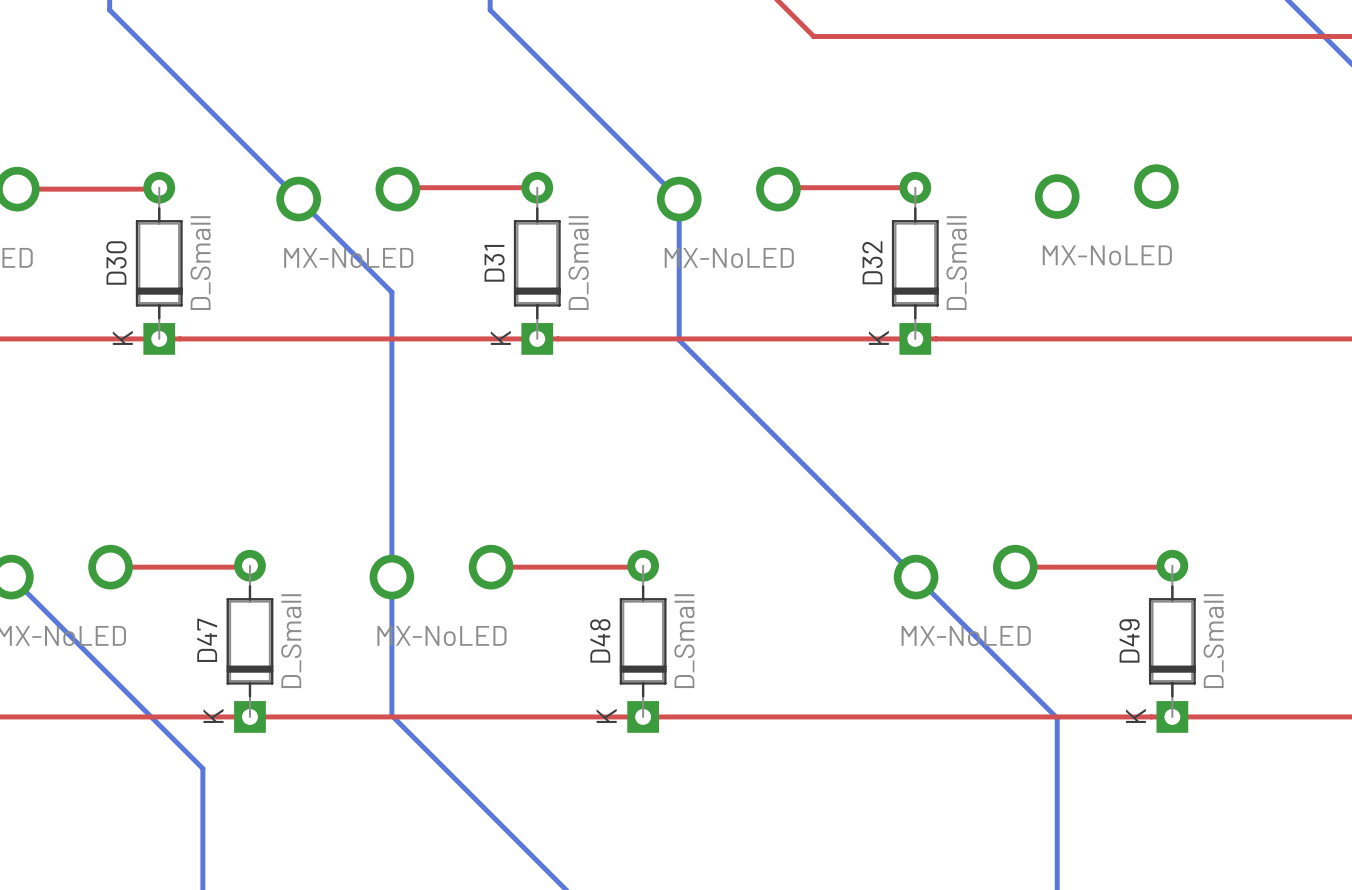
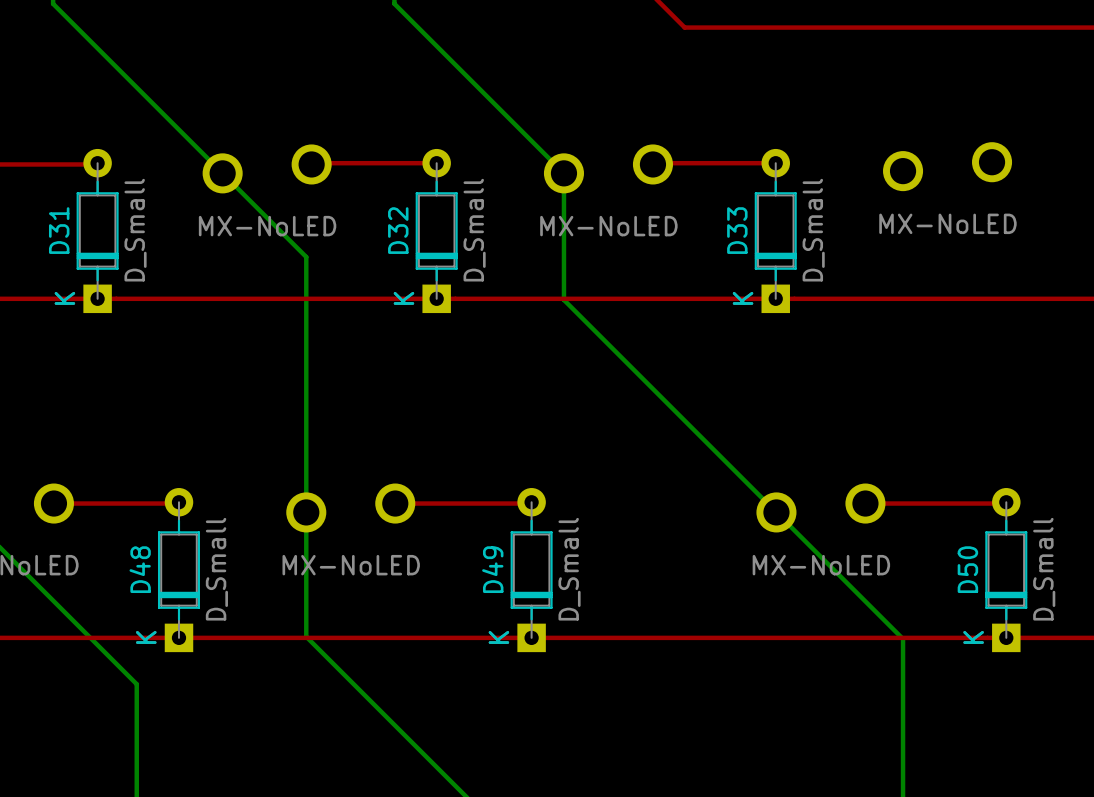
D30 name: D30 (116, 262) -> D31 (59, 230)
D32 name: D32 (872, 262) -> D33 (737, 230)
D31 name: D31 (494, 263) -> D32 (398, 230)
D47 name: D47 (207, 640) -> D48 (140, 569)
D48 name: D48 (600, 640) -> D49 (492, 569)
D49 name: D49 (1129, 640) -> D50 (967, 569)

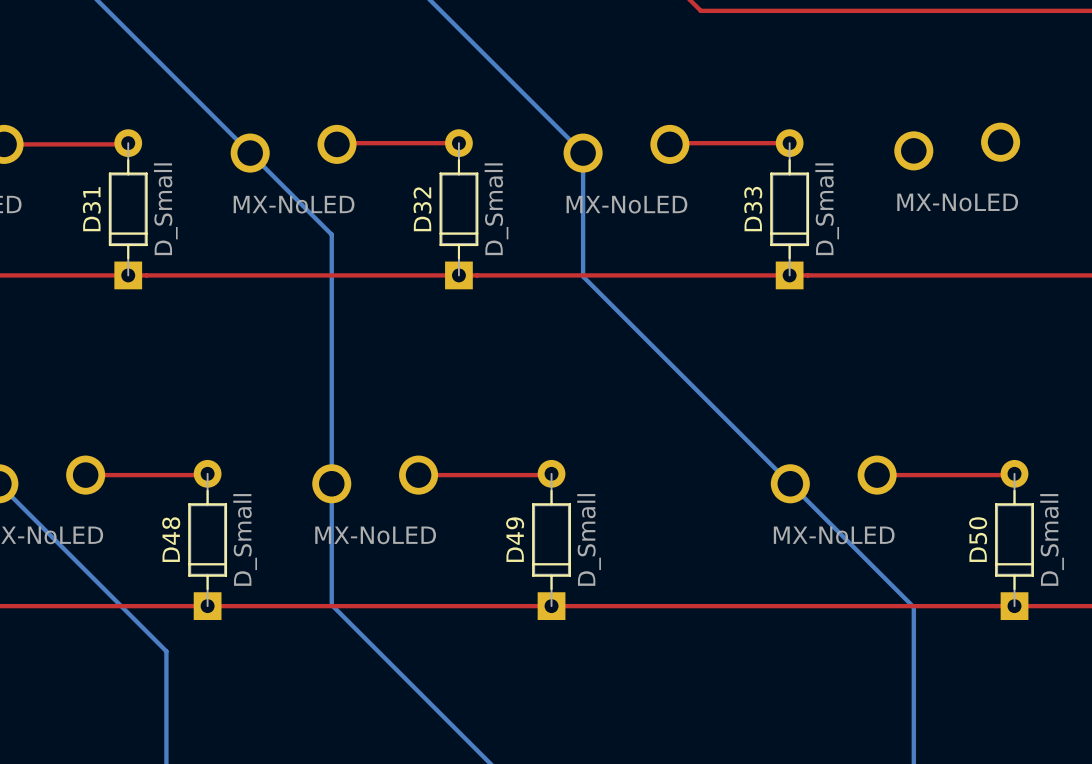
D31 footprint: [76, 148, 119, 314] -> [108, 129, 148, 290]
D32 footprint: [415, 148, 458, 314] -> [439, 129, 479, 290]
D33 footprint: [754, 148, 797, 314] -> [770, 129, 810, 290]
D48 footprint: [157, 488, 200, 653] -> [188, 459, 228, 621]
D49 footprint: [510, 488, 553, 653] -> [532, 459, 571, 621]
D50 footprint: [985, 488, 1028, 653] -> [995, 459, 1034, 621]

